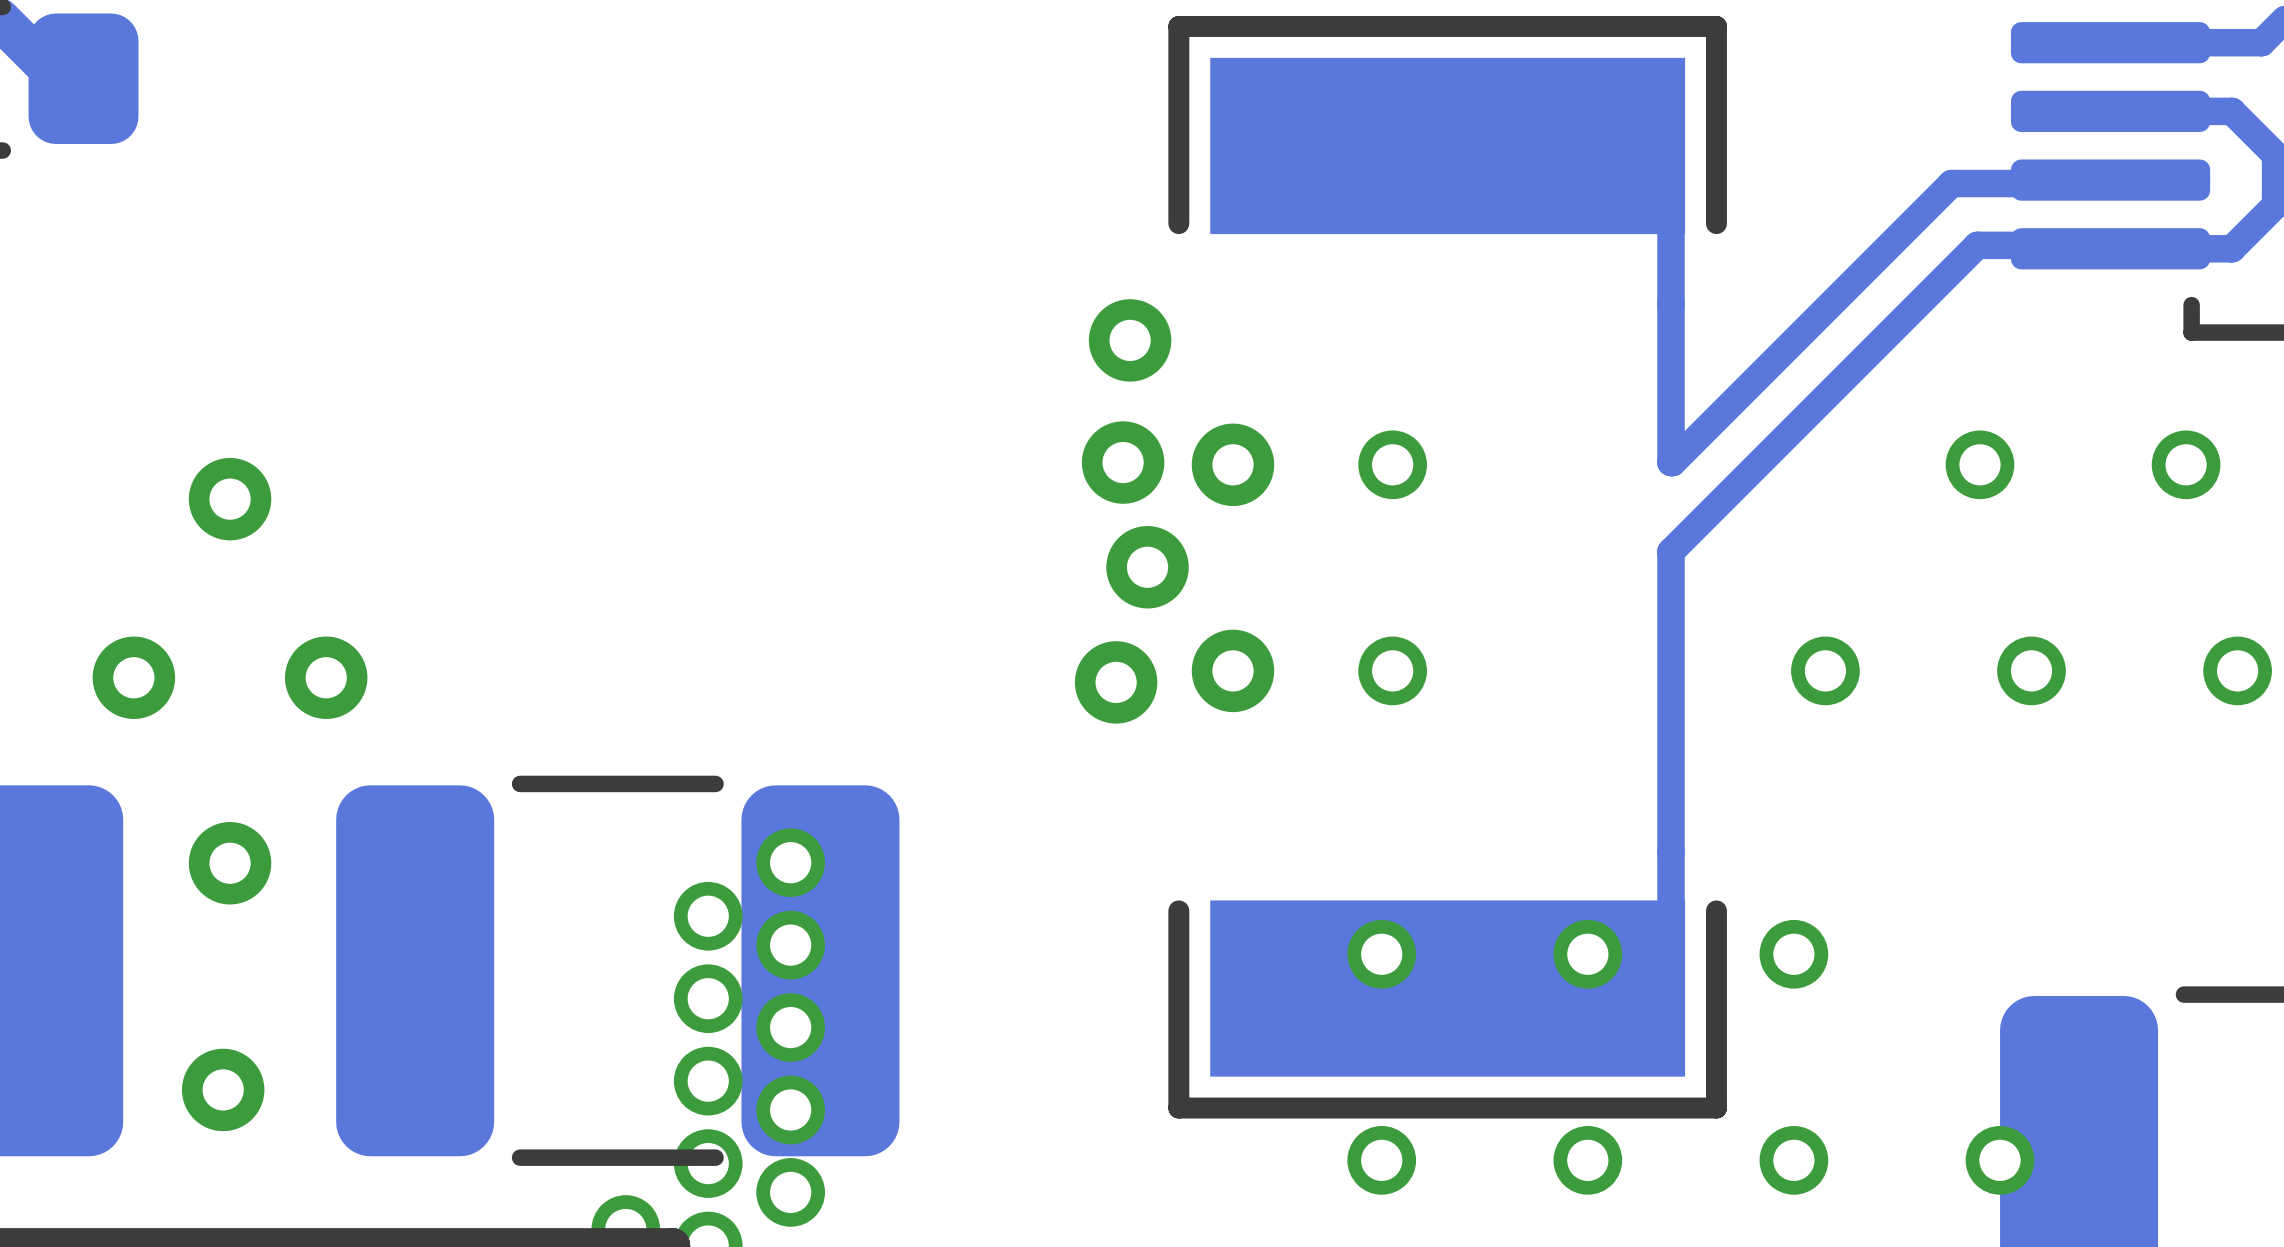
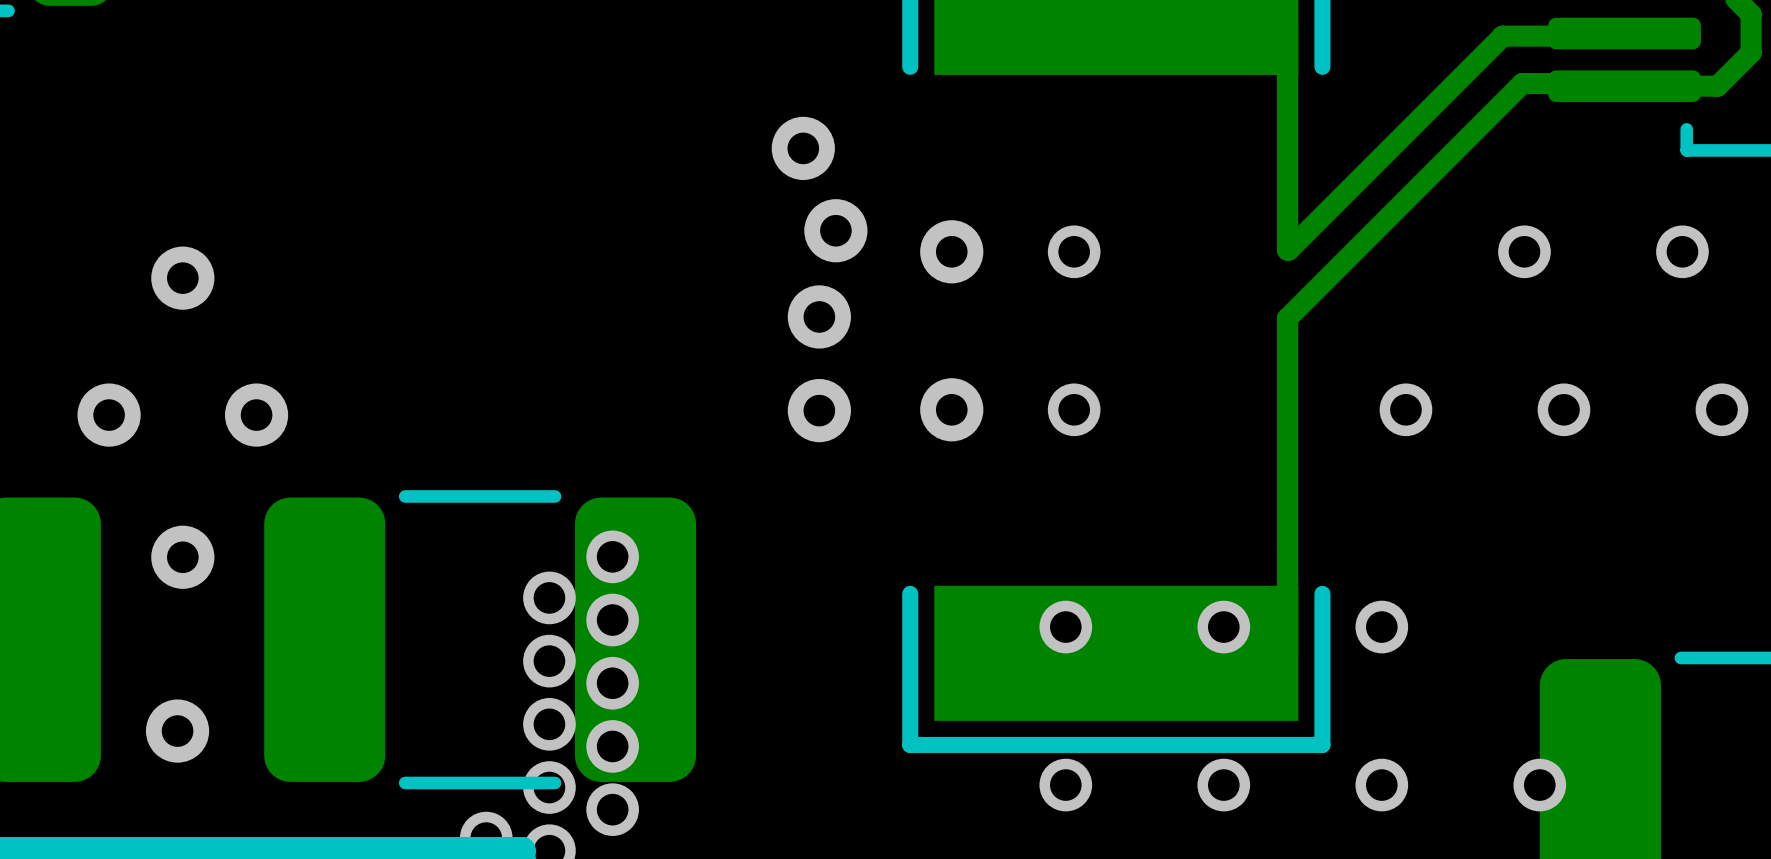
via: none -> (803, 148)
via: (1130, 340) -> none
via position: (1123, 462) -> (835, 230)
via: none -> (819, 316)
via: (1147, 567) -> none
via position: (1116, 682) -> (819, 410)

